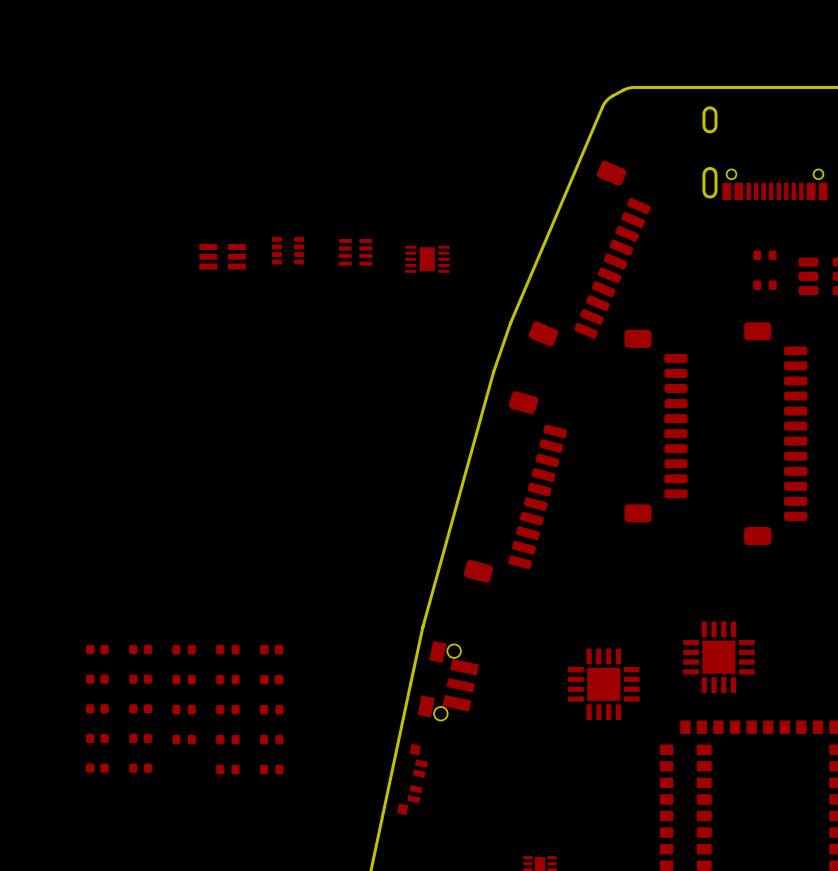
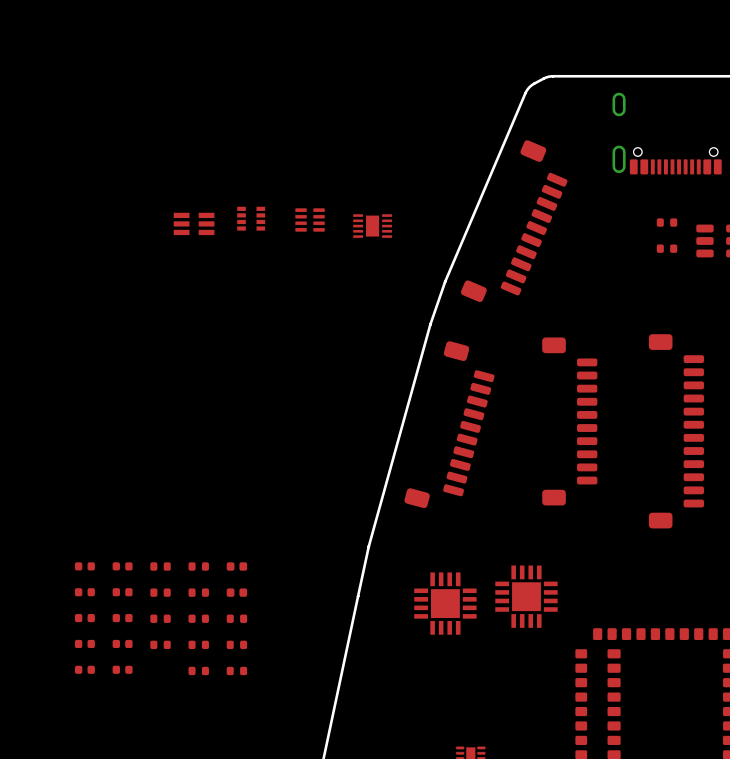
part position: (656, 426) -> (569, 421)
part position: (775, 433) -> (676, 431)
part position: (718, 657) -> (445, 603)
part: (448, 680) -> none
part: (412, 779) -> none

